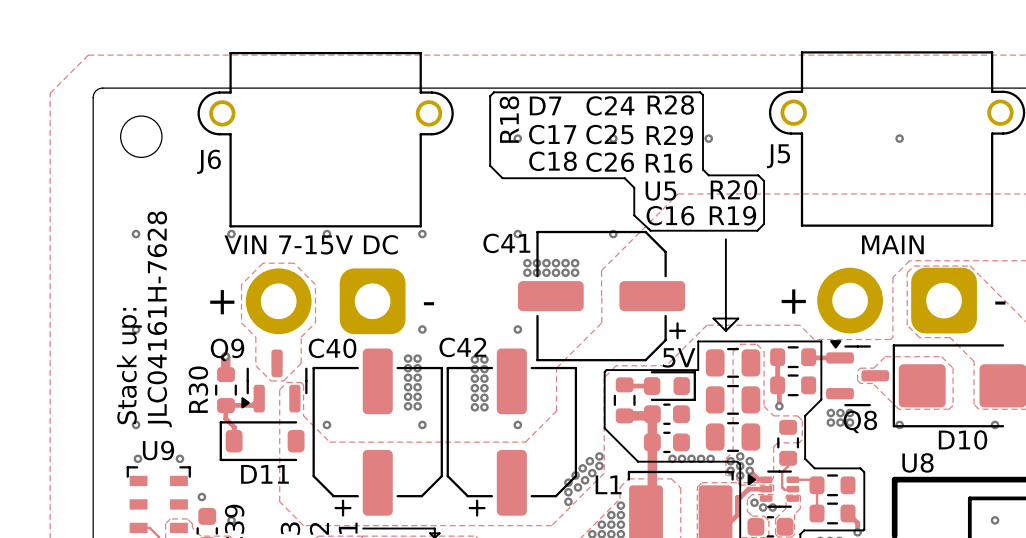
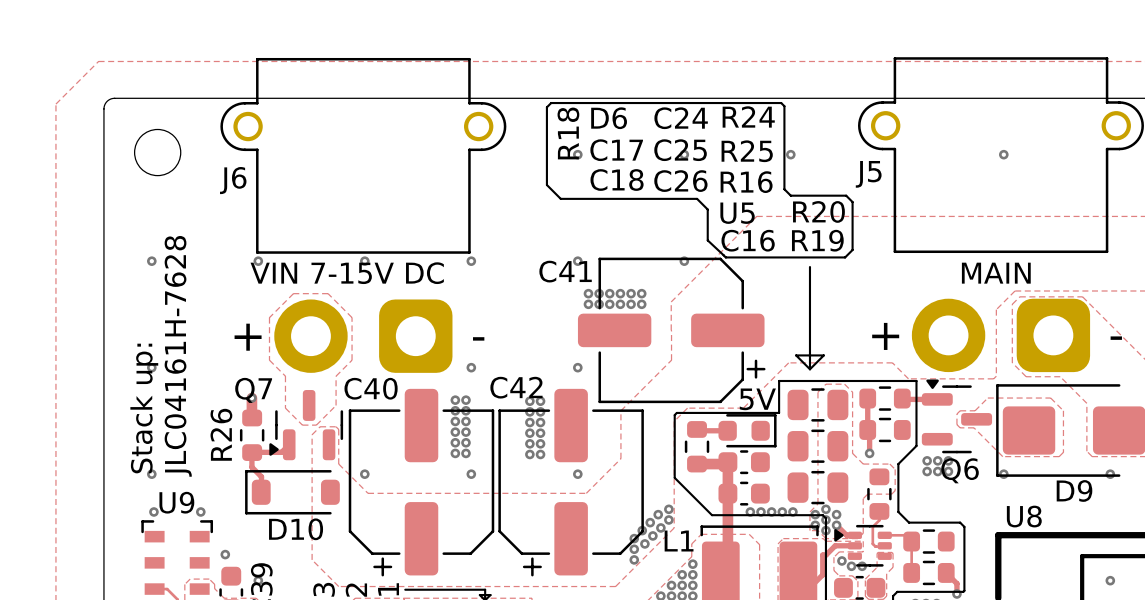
D7 name: D7 (545, 105) -> D6 (609, 118)
R28 name: R28 (670, 105) -> R24 (748, 116)
R29 name: R29 (669, 135) -> R25 (747, 151)
Q9 name: Q9 (227, 349) -> Q7 (253, 390)
R30 name: R30 (198, 389) -> R26 (221, 434)
Q8 name: Q8 (860, 421) -> Q6 (960, 470)
D10 name: D10 (963, 440) -> D9 (1074, 490)
D11 name: D11 (264, 474) -> D10 (296, 529)

